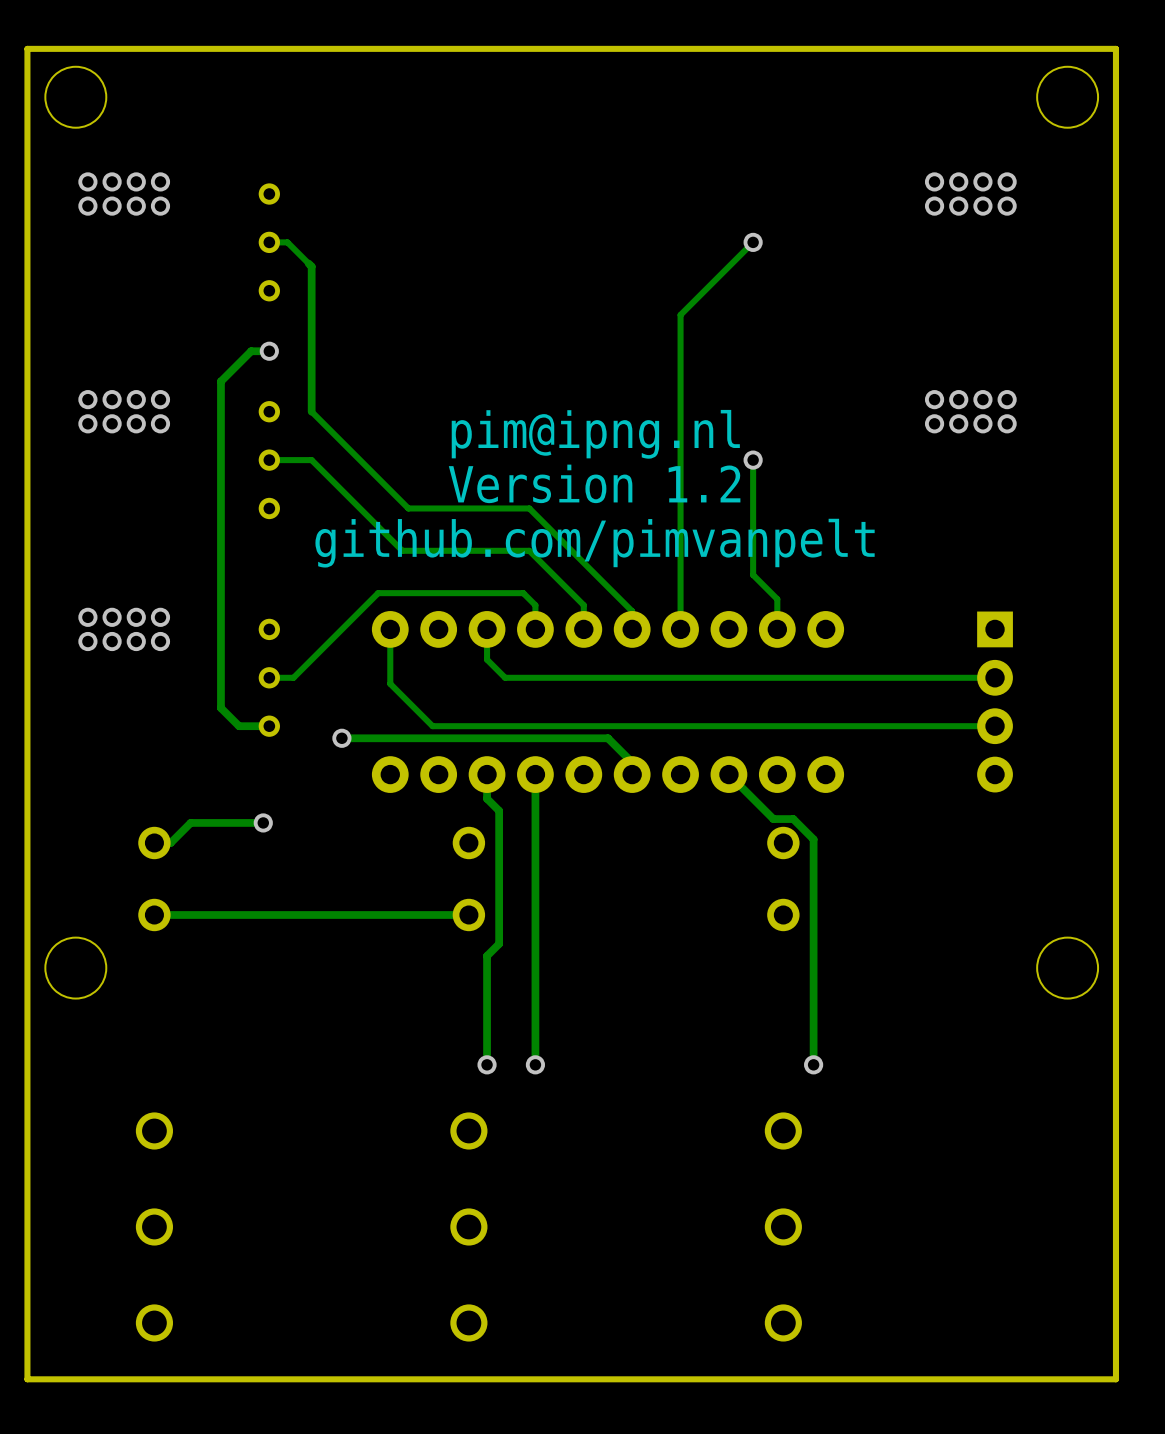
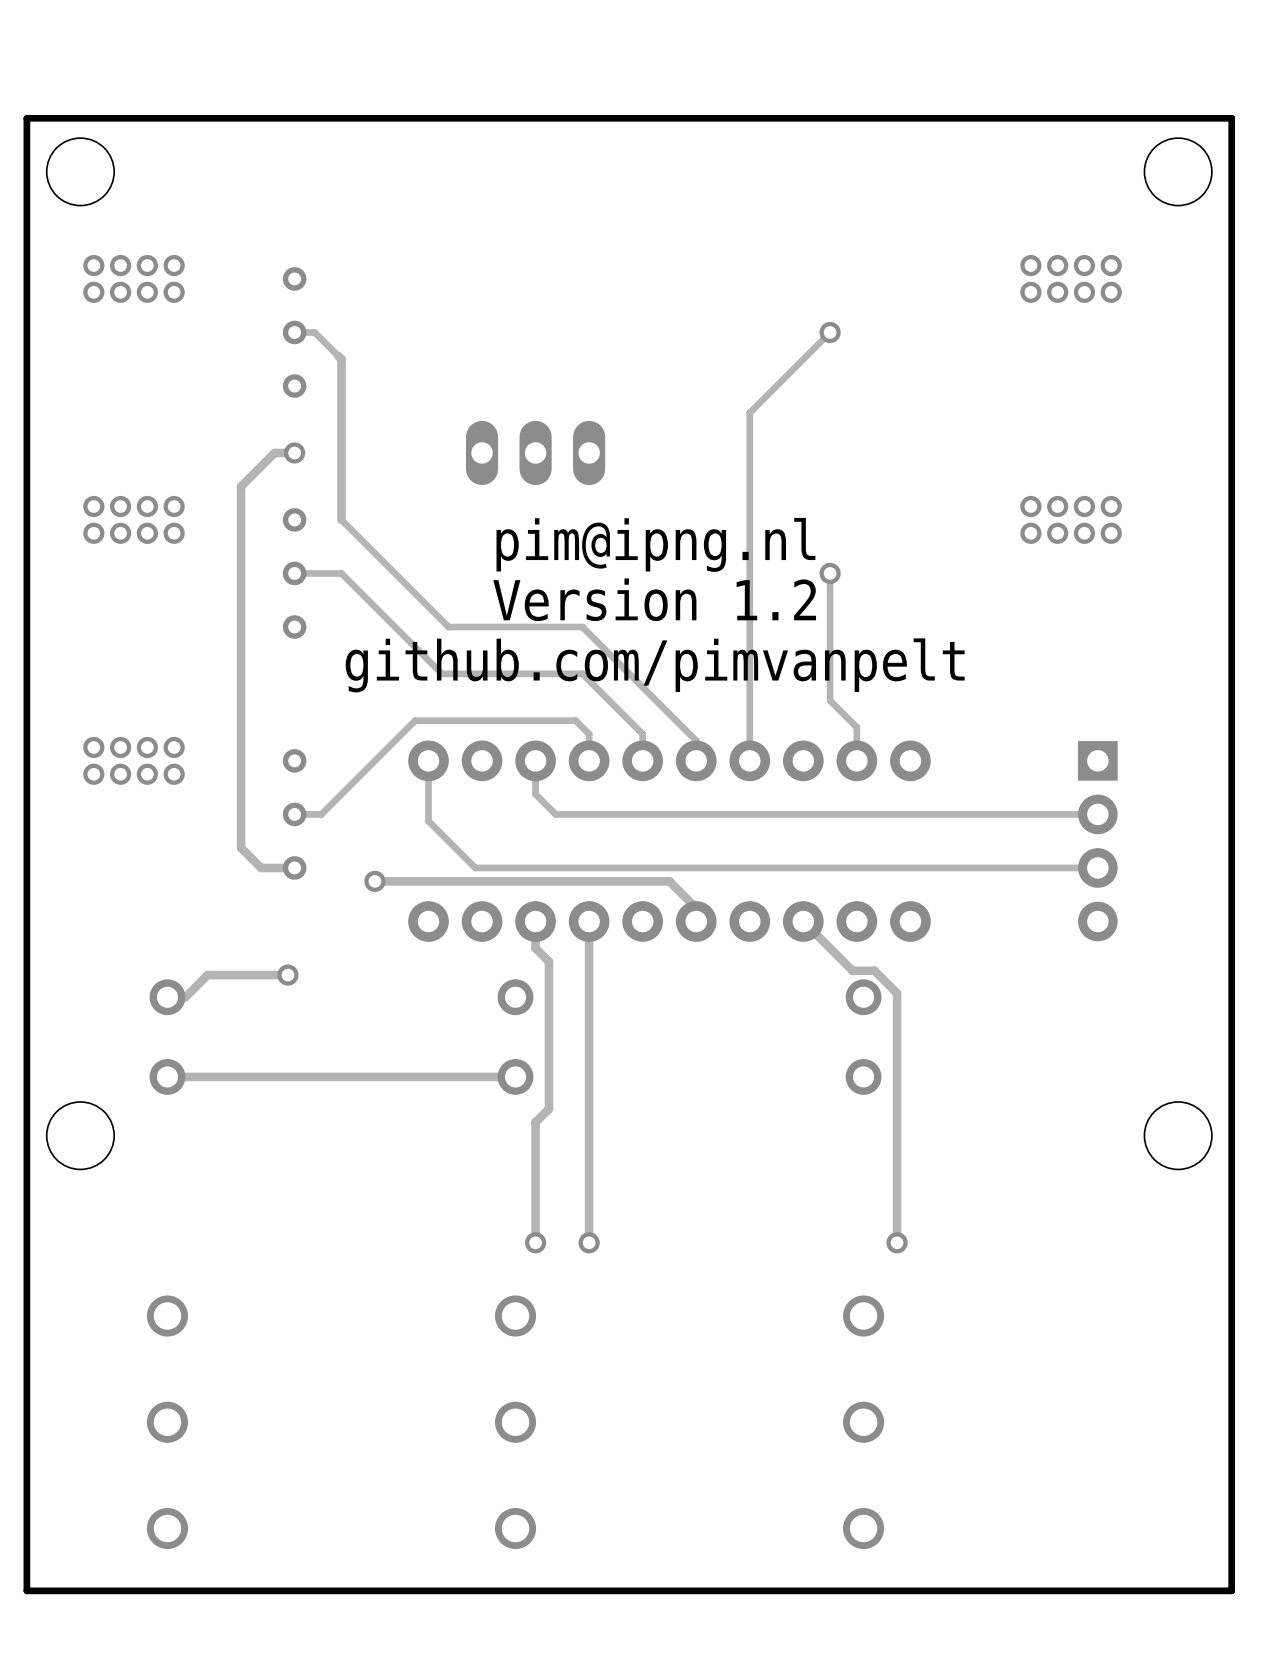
part: none -> (535, 452)

